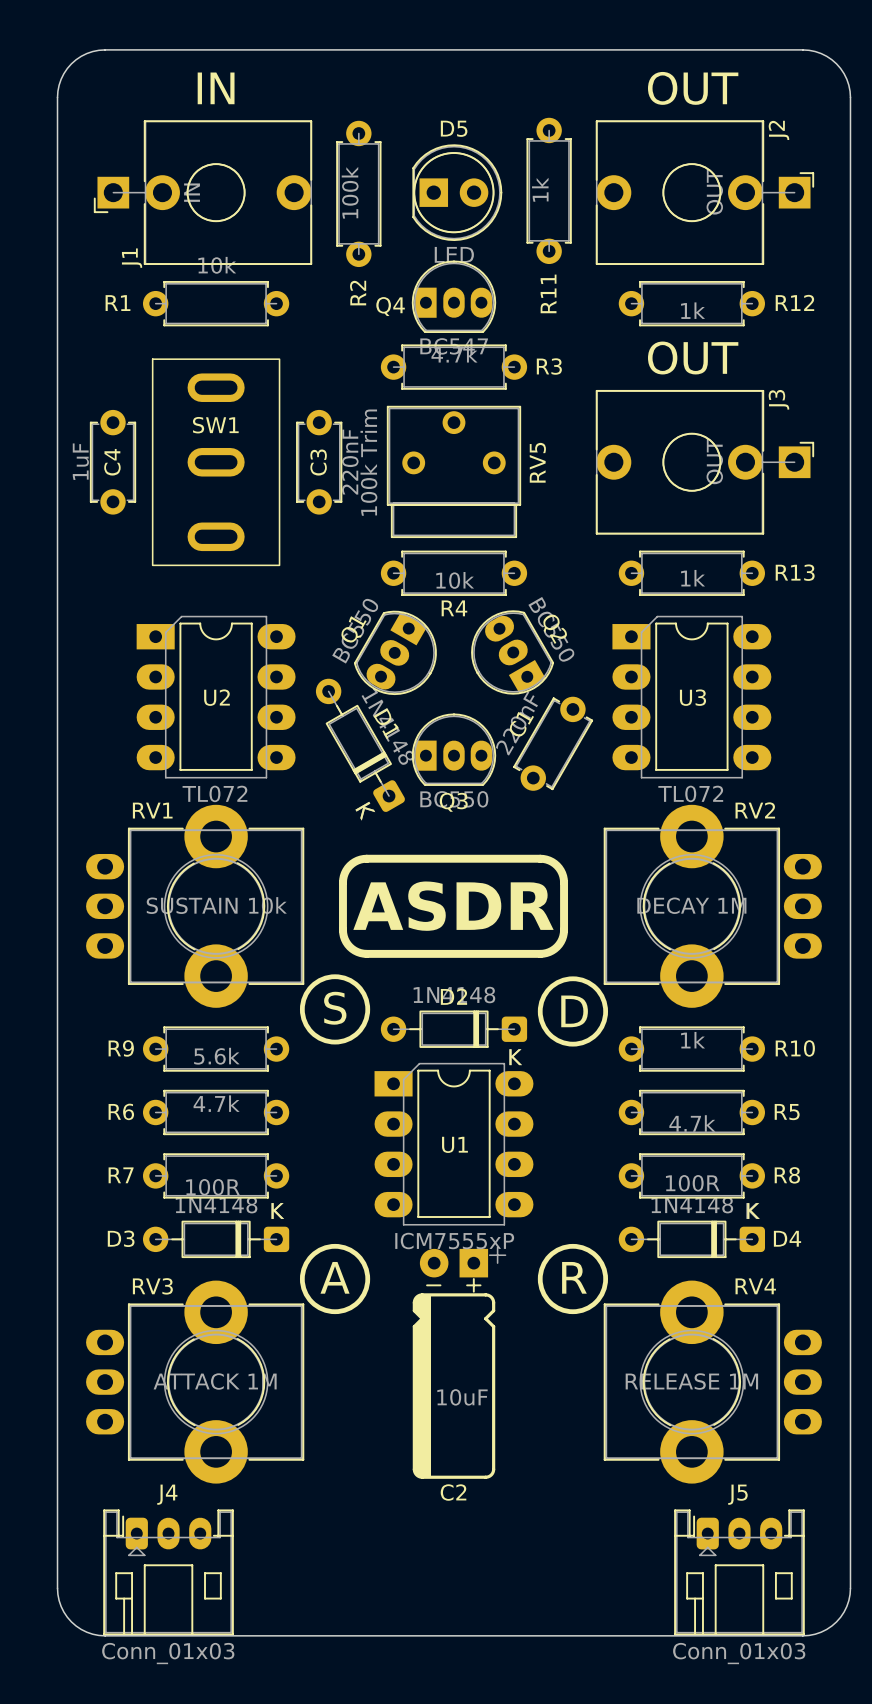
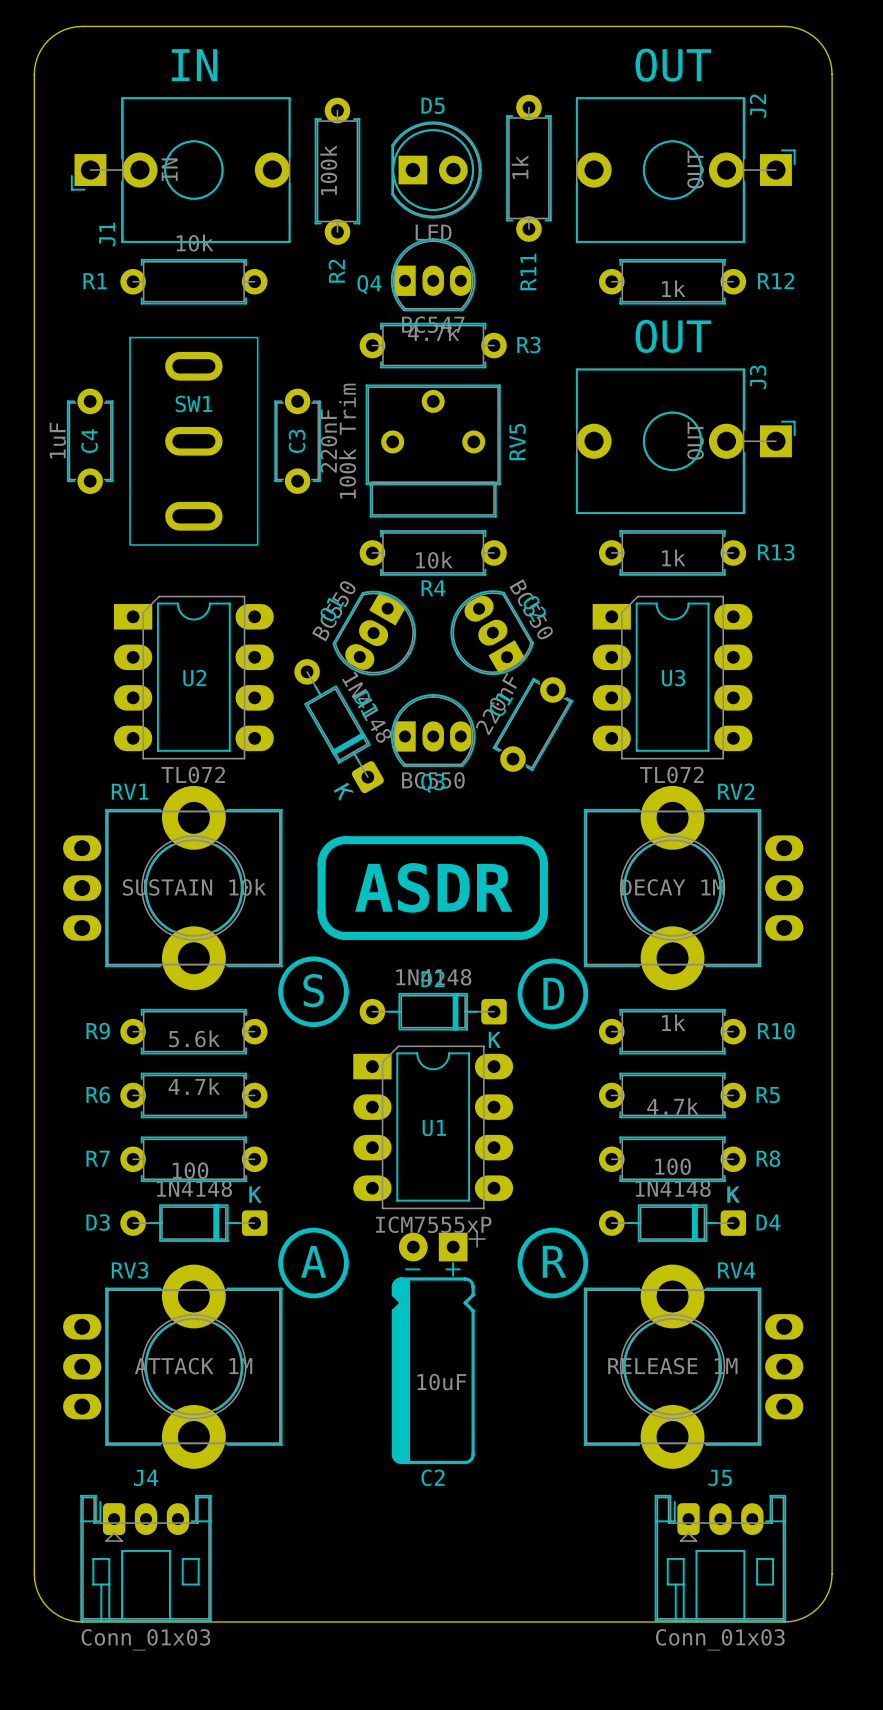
R8 value: 100R (692, 1183) -> 100 (673, 1166)
R7 value: 100R (213, 1187) -> 100 (190, 1170)

